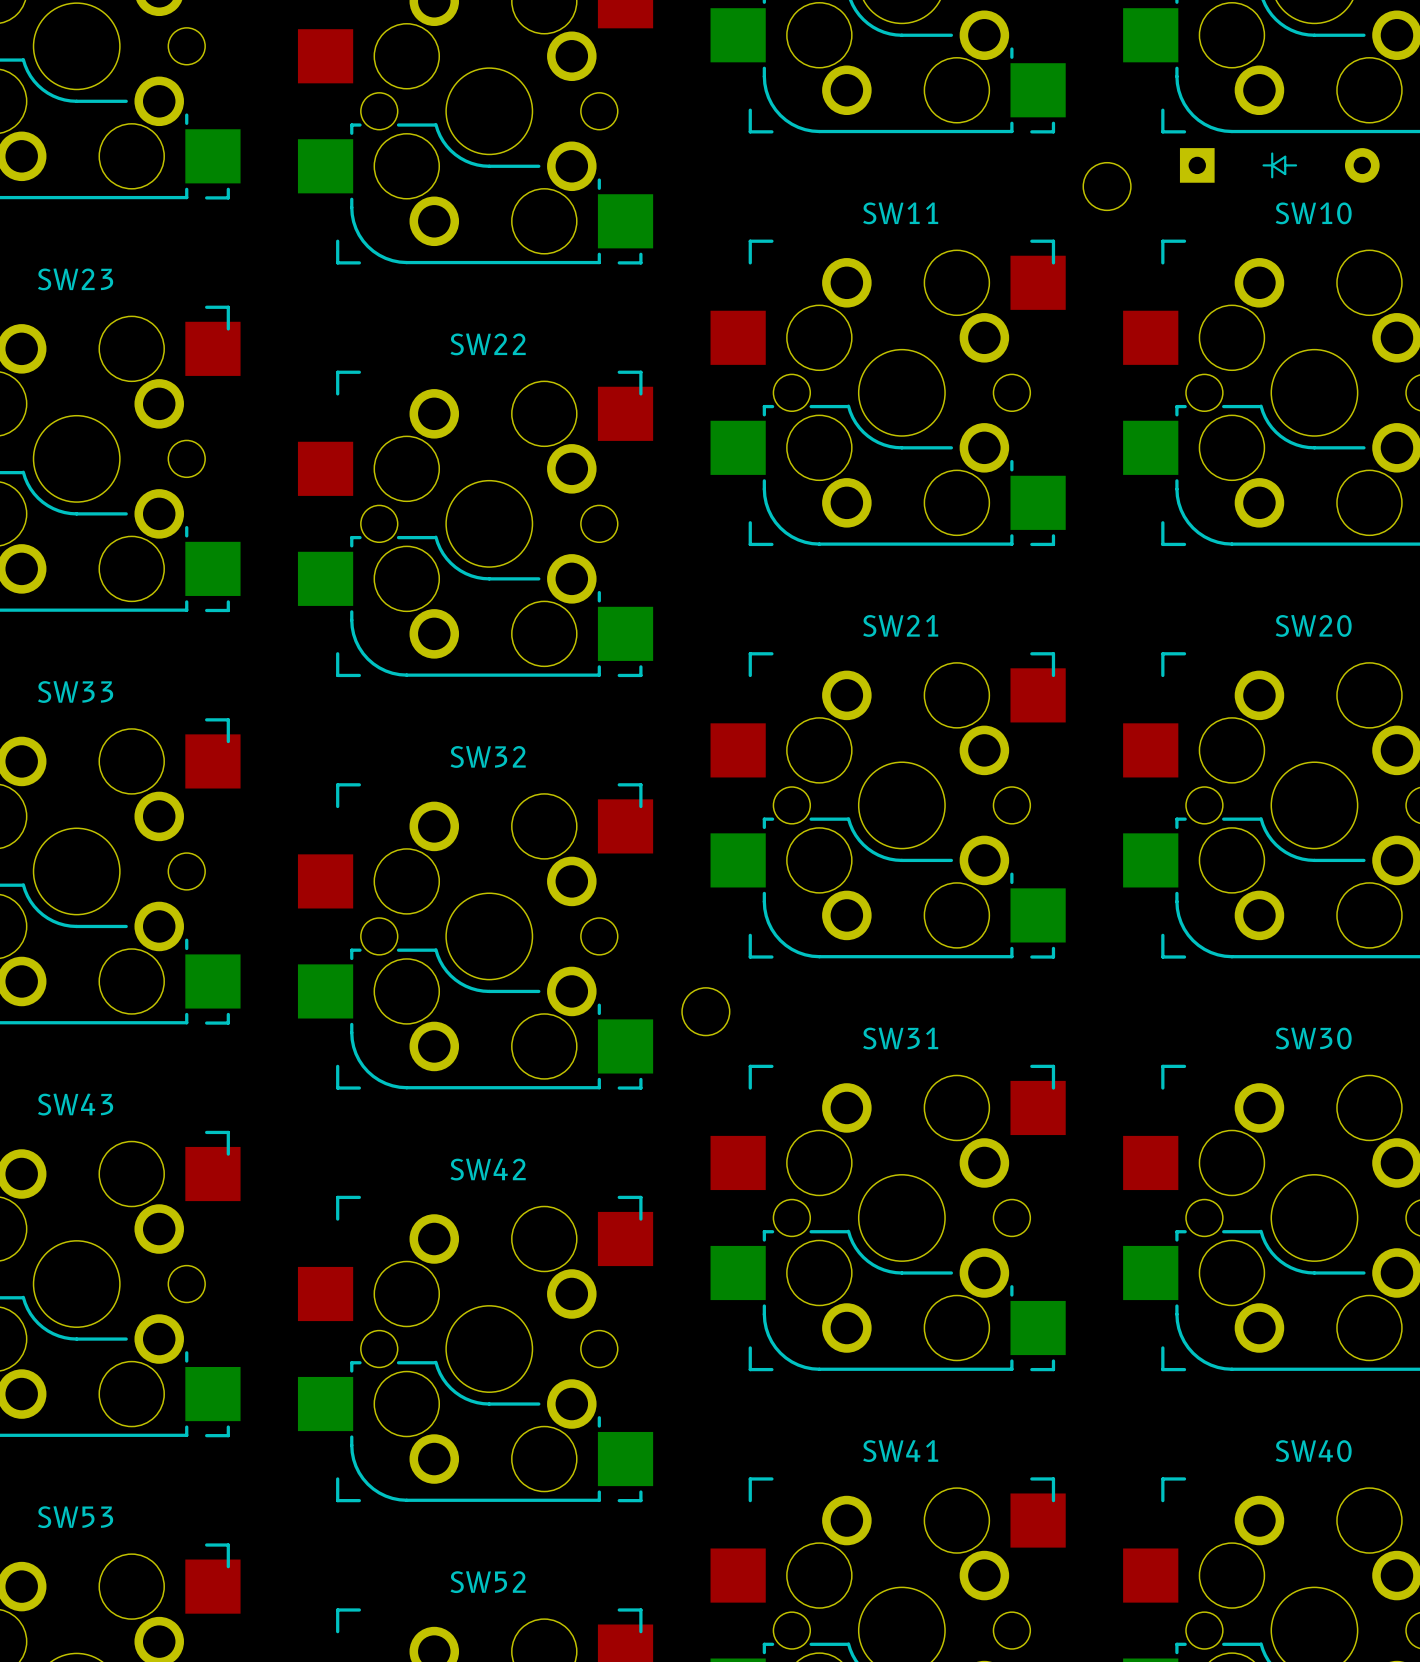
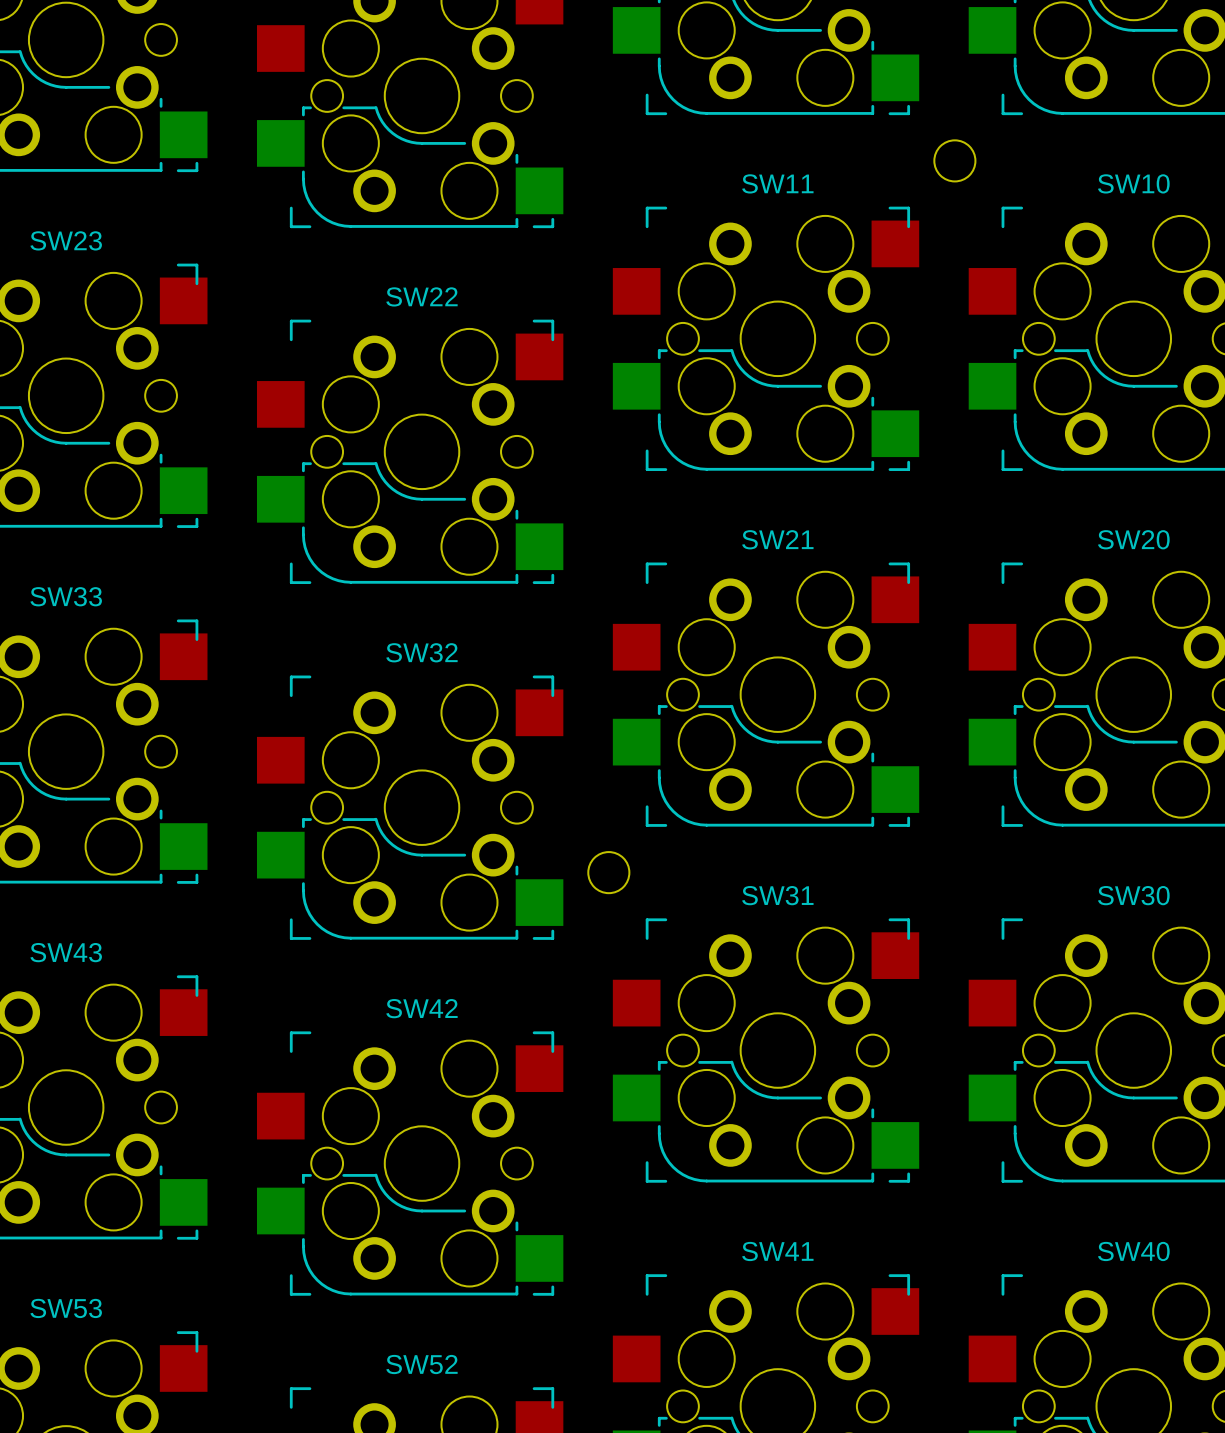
part: (1279, 165) -> none

